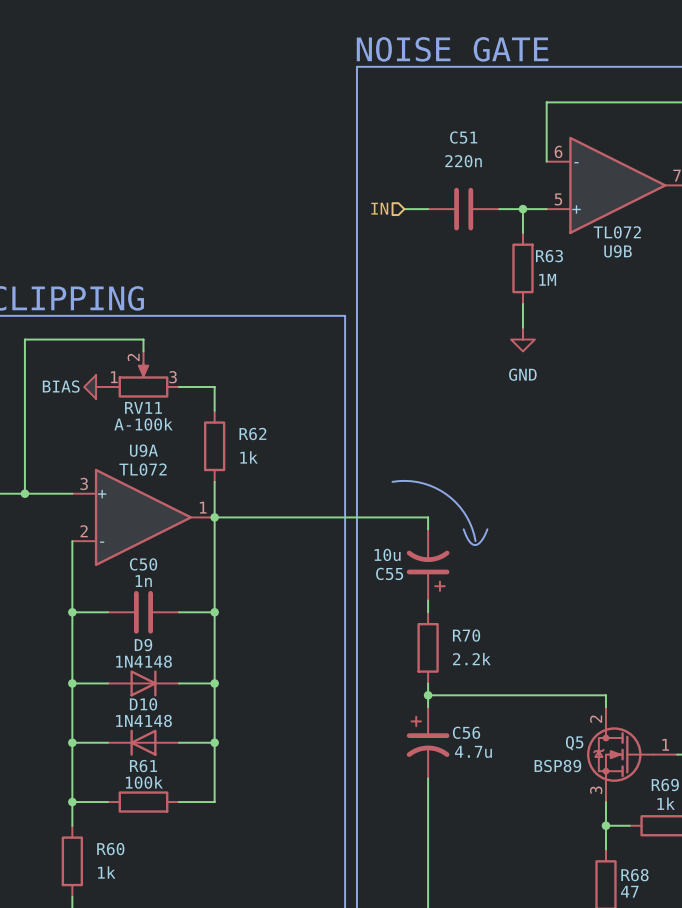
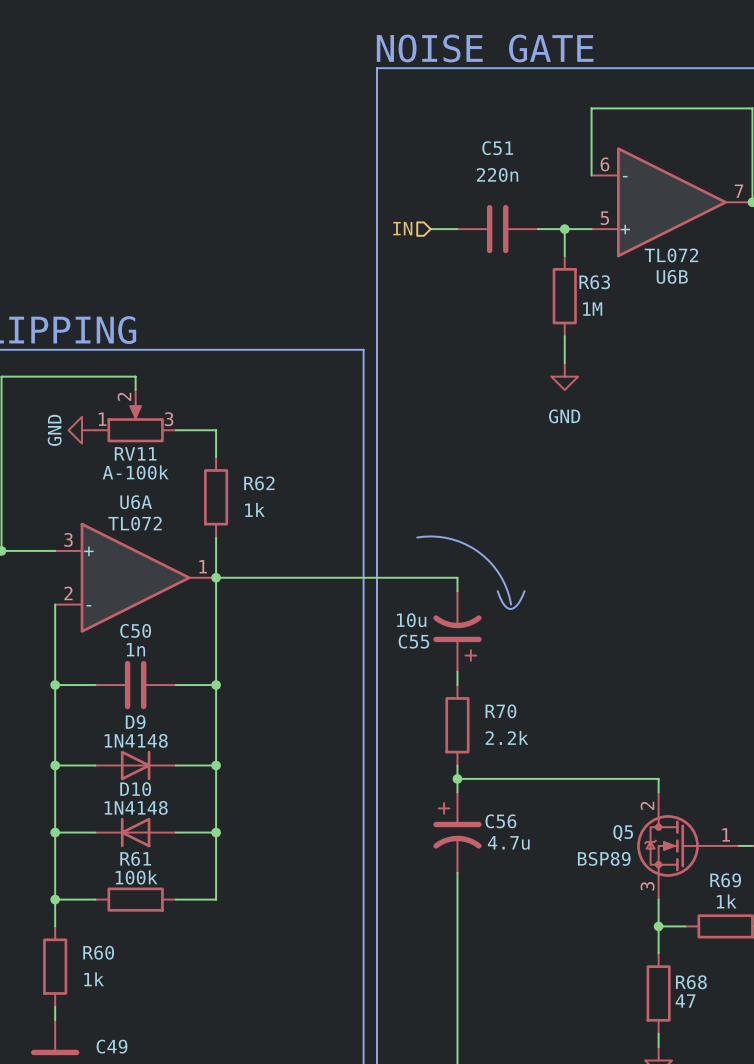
U9B name: U9B (618, 251) -> U6B (672, 276)
power symbol: BIAS (96, 386) -> GND (82, 430)
U9A name: U9A (143, 450) -> U6A (136, 502)

